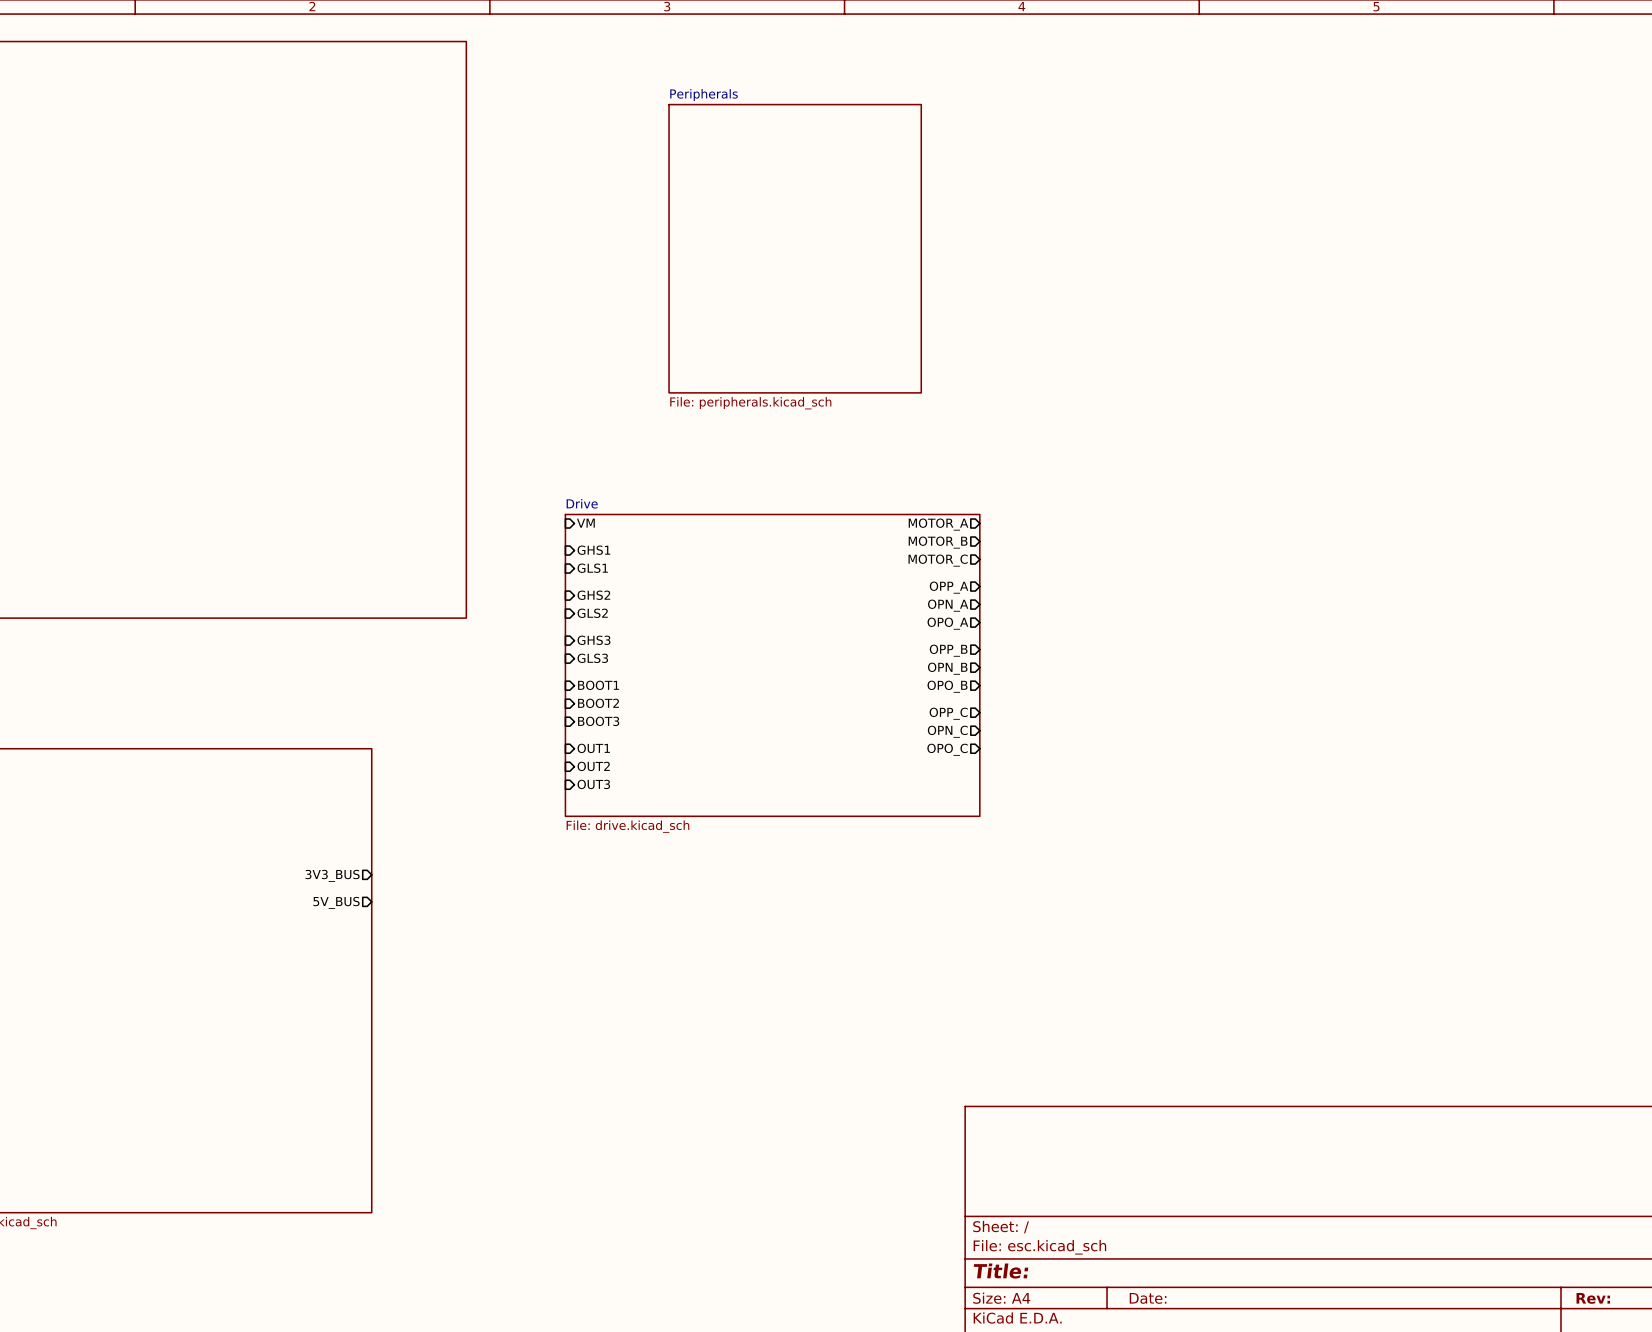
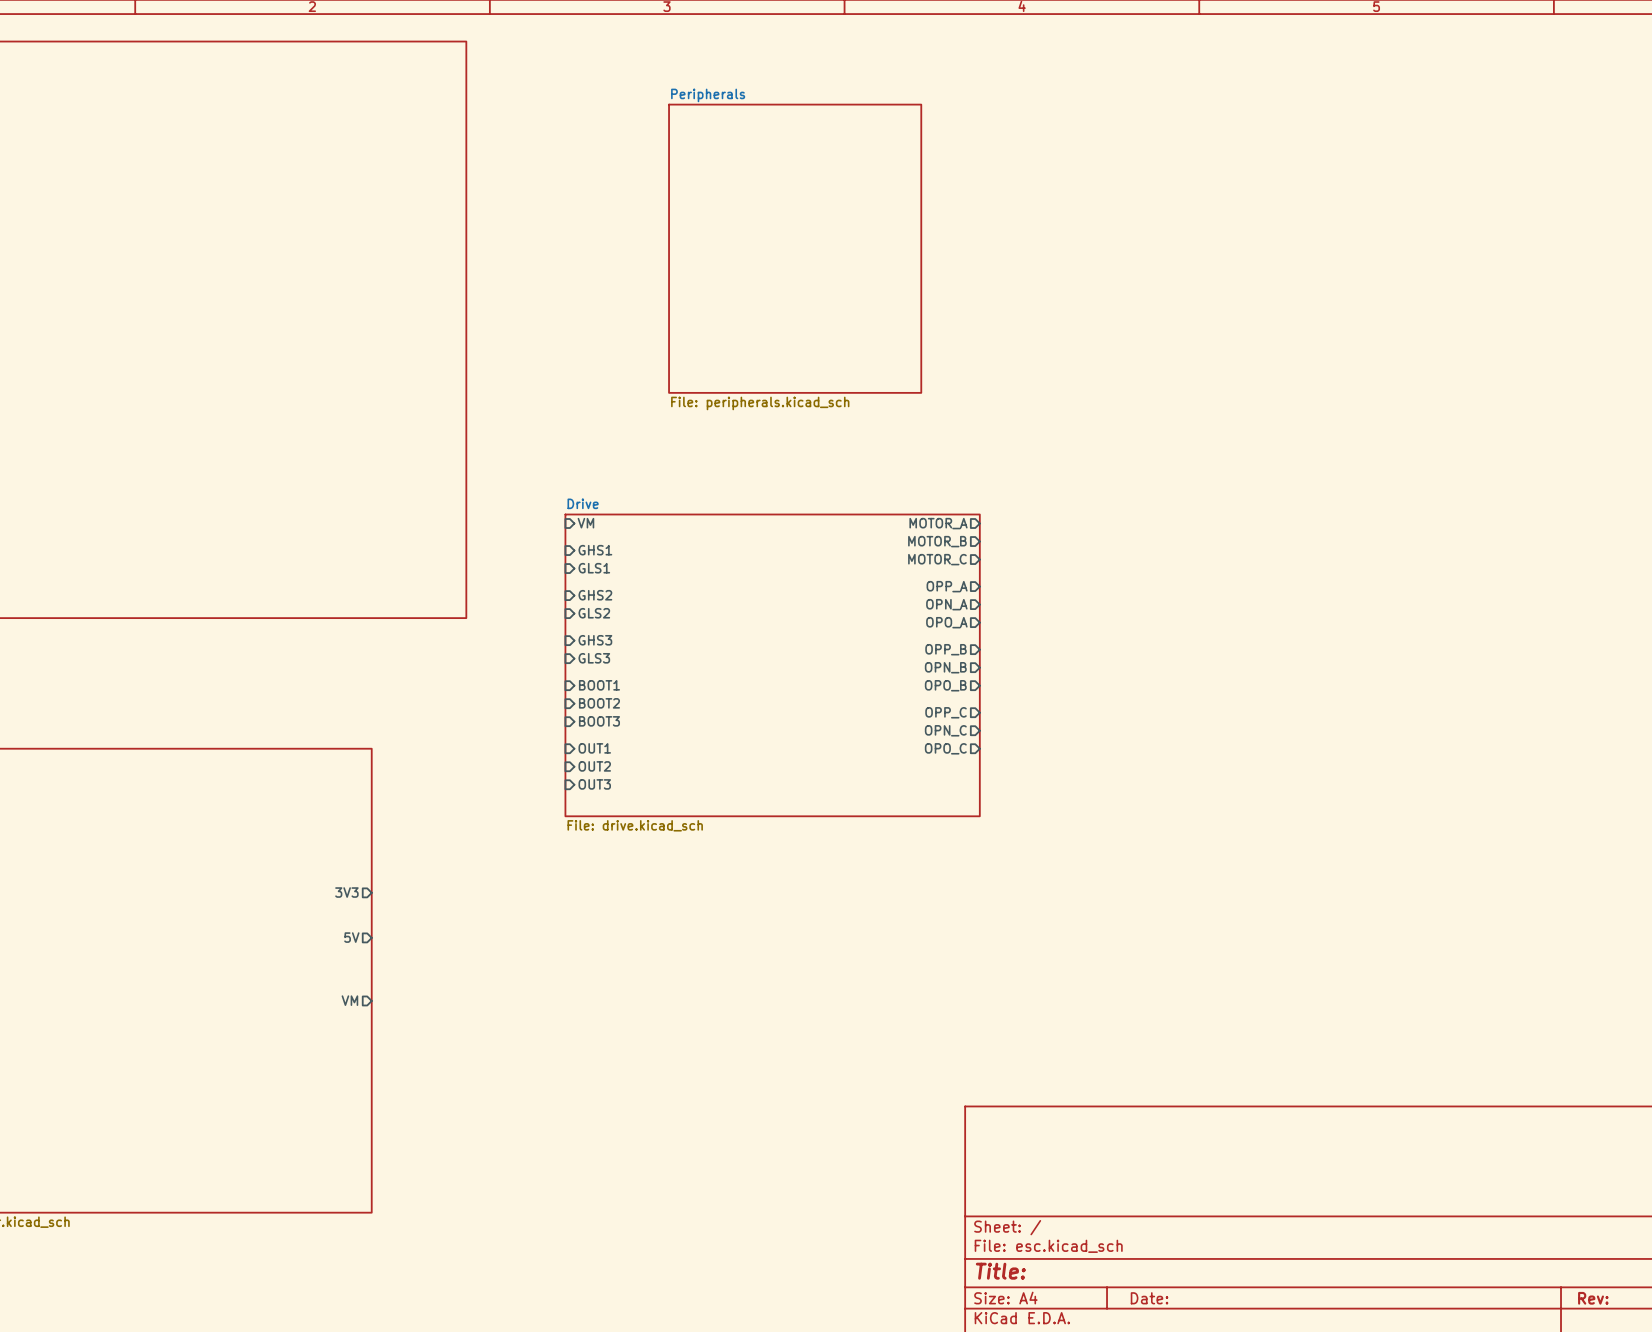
sheet pin: 3V3_BUS (332, 875) -> none
sheet pin: none -> 3V3 (346, 892)
sheet pin: 5V_BUS (336, 902) -> none
sheet pin: none -> 5V (351, 937)
sheet pin: none -> VM (349, 1000)

